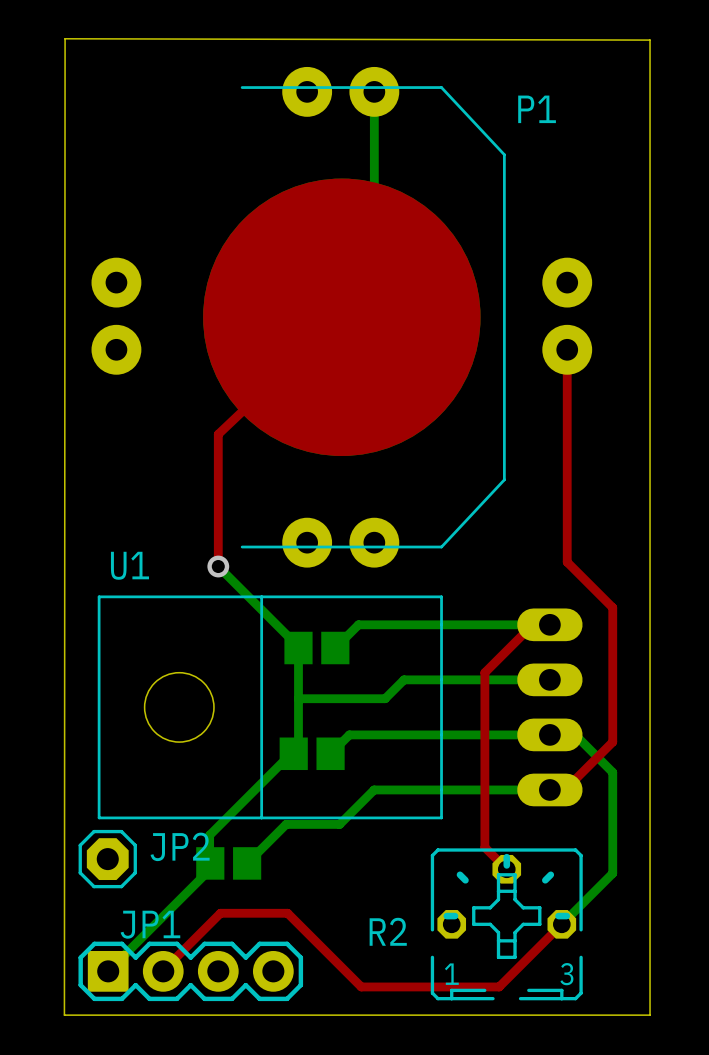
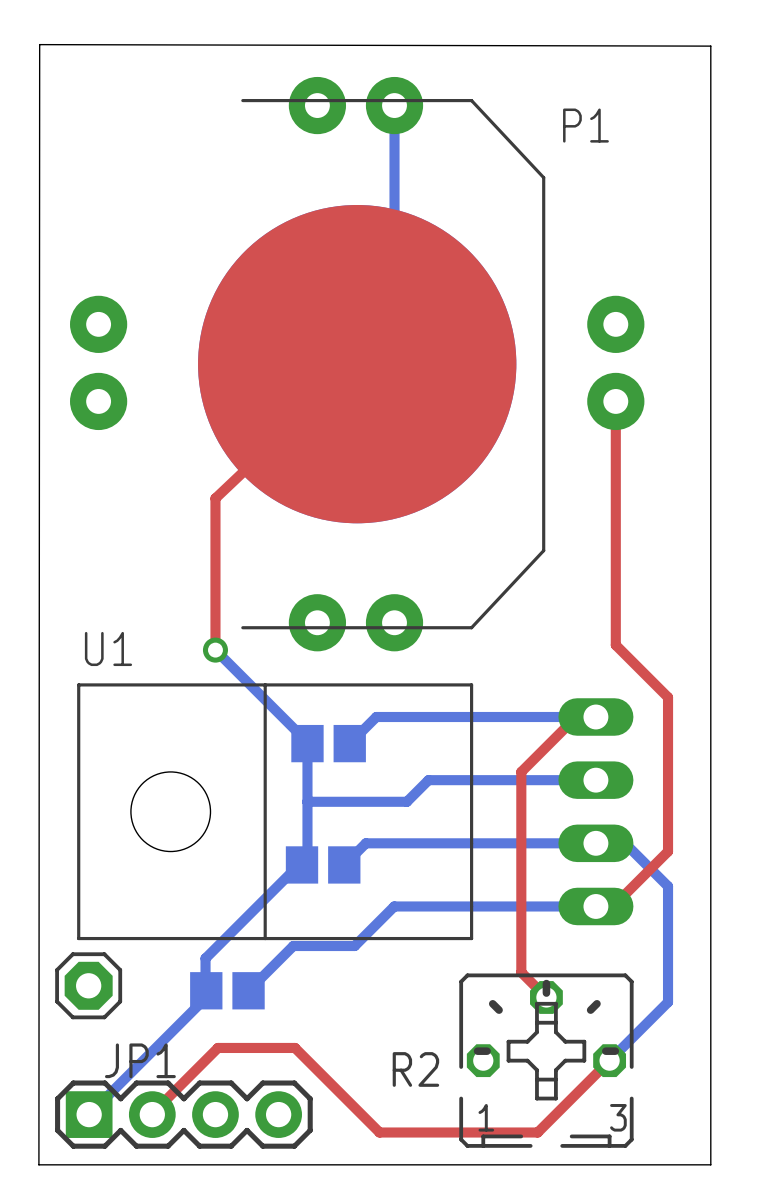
JP2 name: JP2 (180, 846) -> none

